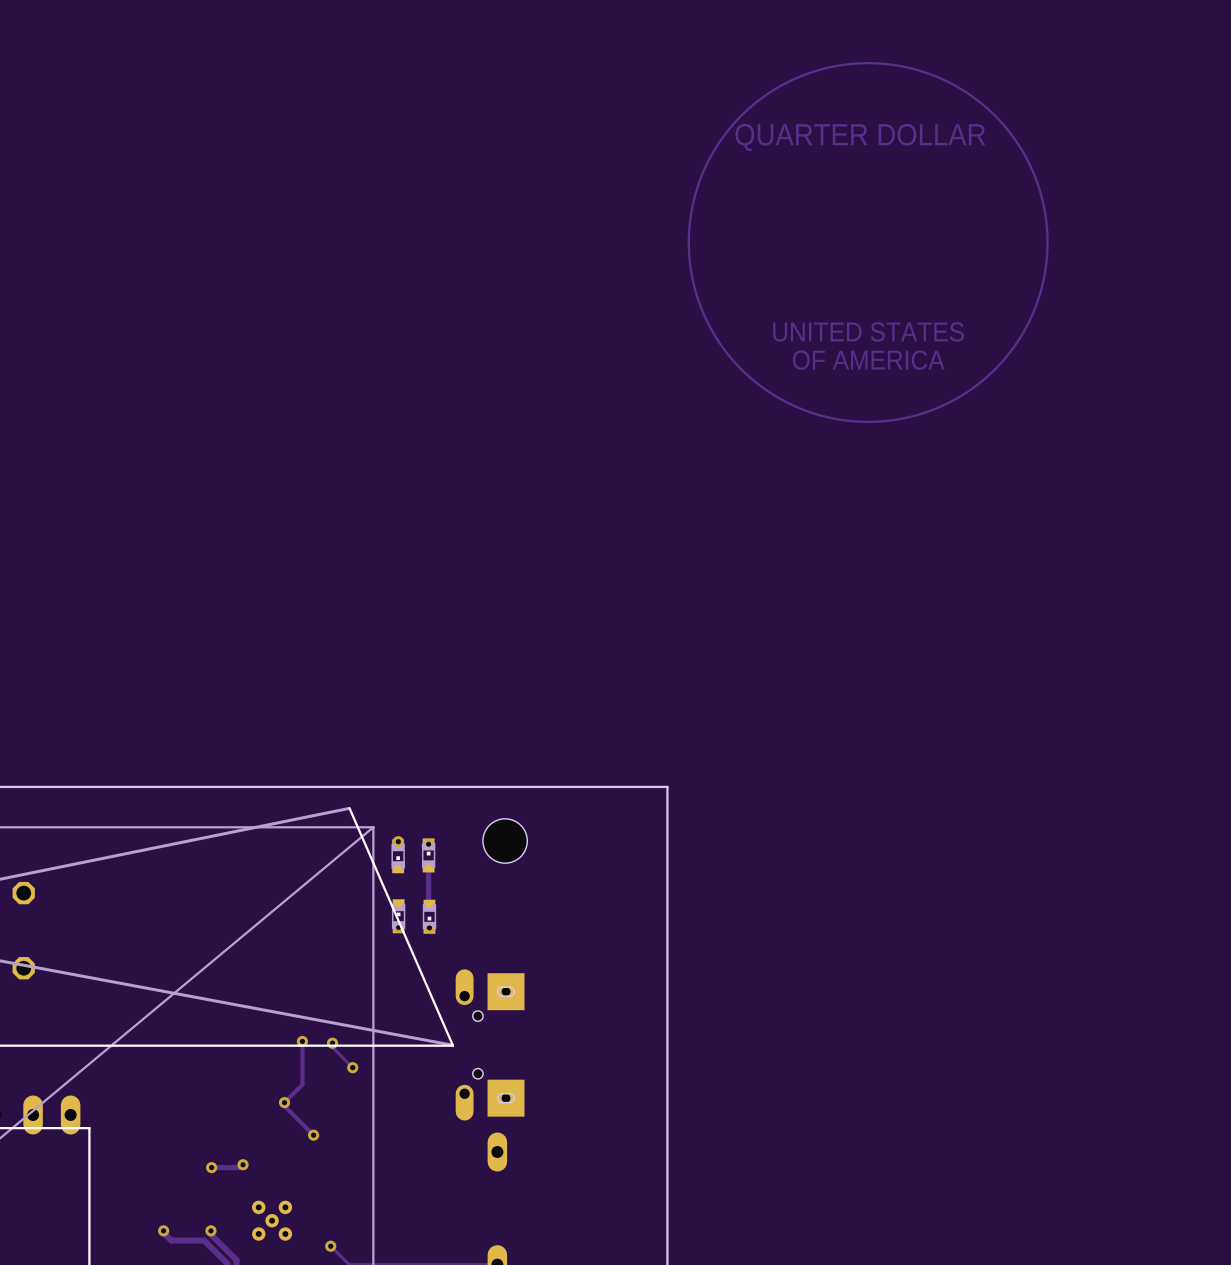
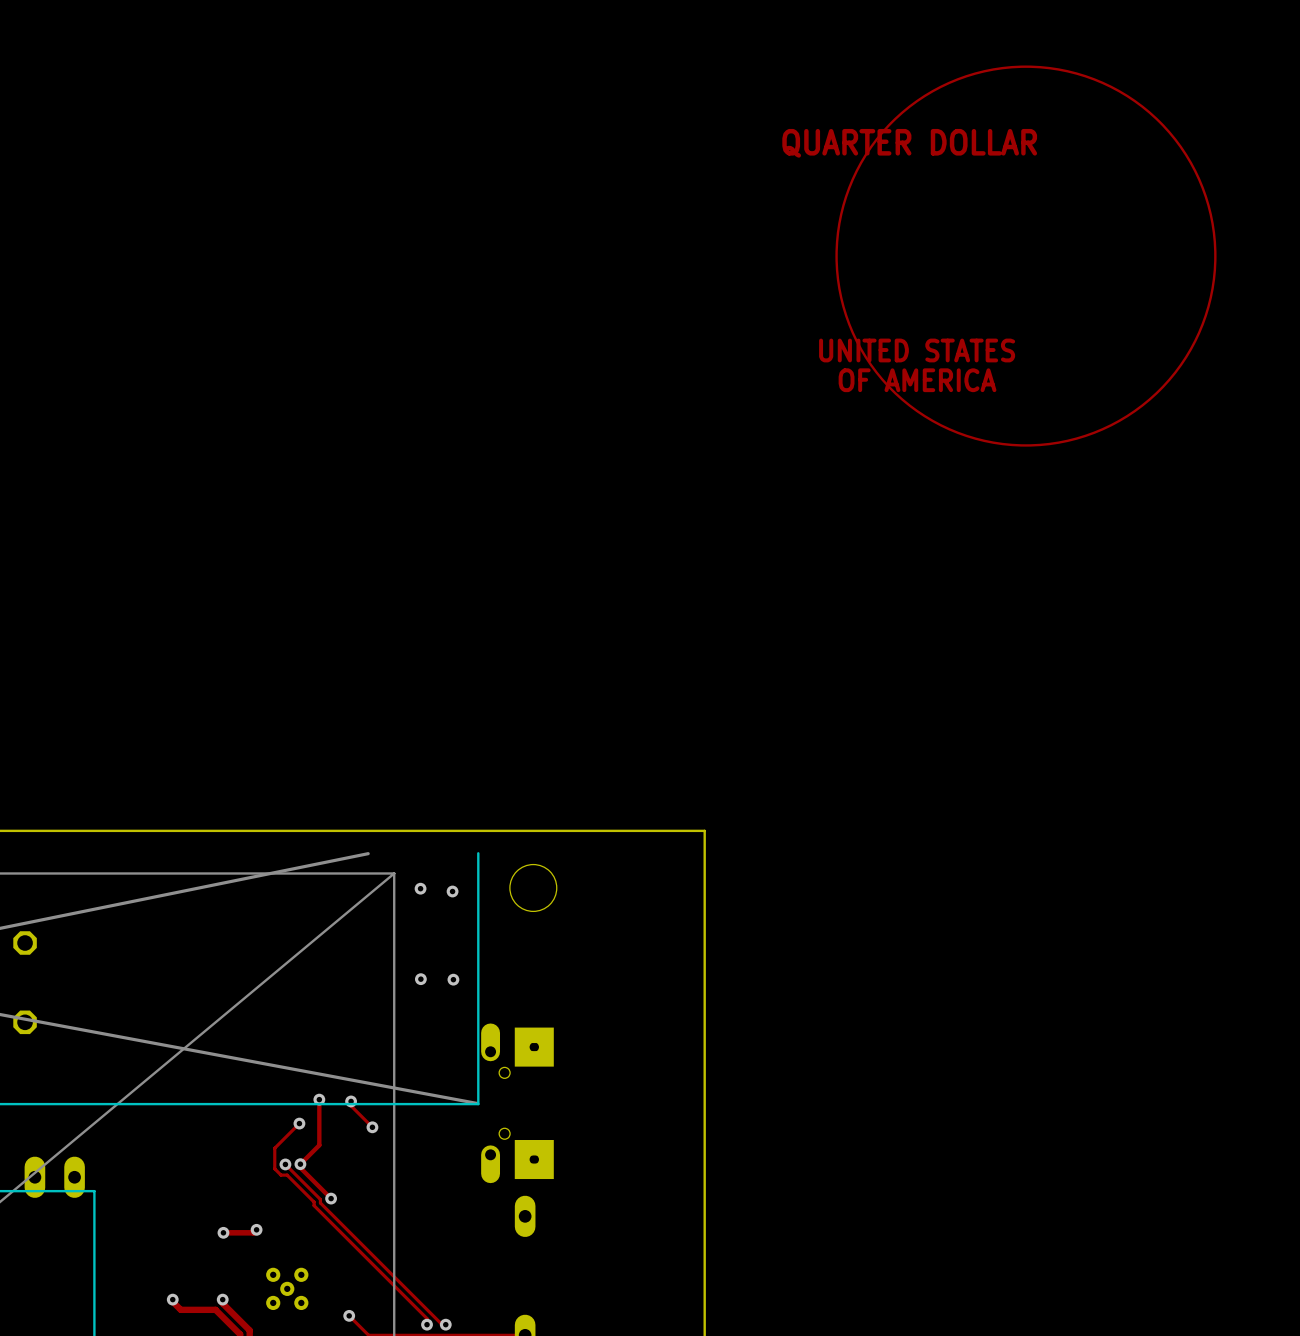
drawing position: (868, 242) -> (1025, 256)
line: (349, 808) (453, 1045) -> (478, 853) (478, 1104)
part: (428, 855) -> none
part: (398, 856) -> none
track: (428, 866) (429, 905) -> none
part: (398, 916) -> none
part: (429, 916) -> none
track: none -> (299, 1123) (274, 1148) (274, 1168) (281, 1175) (287, 1175) (314, 1202) (314, 1205) (427, 1318) (427, 1324)
via: none -> (299, 1123)
track: none -> (285, 1164) (320, 1199) (320, 1202) (442, 1324) (445, 1324)
via: none -> (285, 1164)
via: none -> (427, 1324)
via: none -> (445, 1324)

